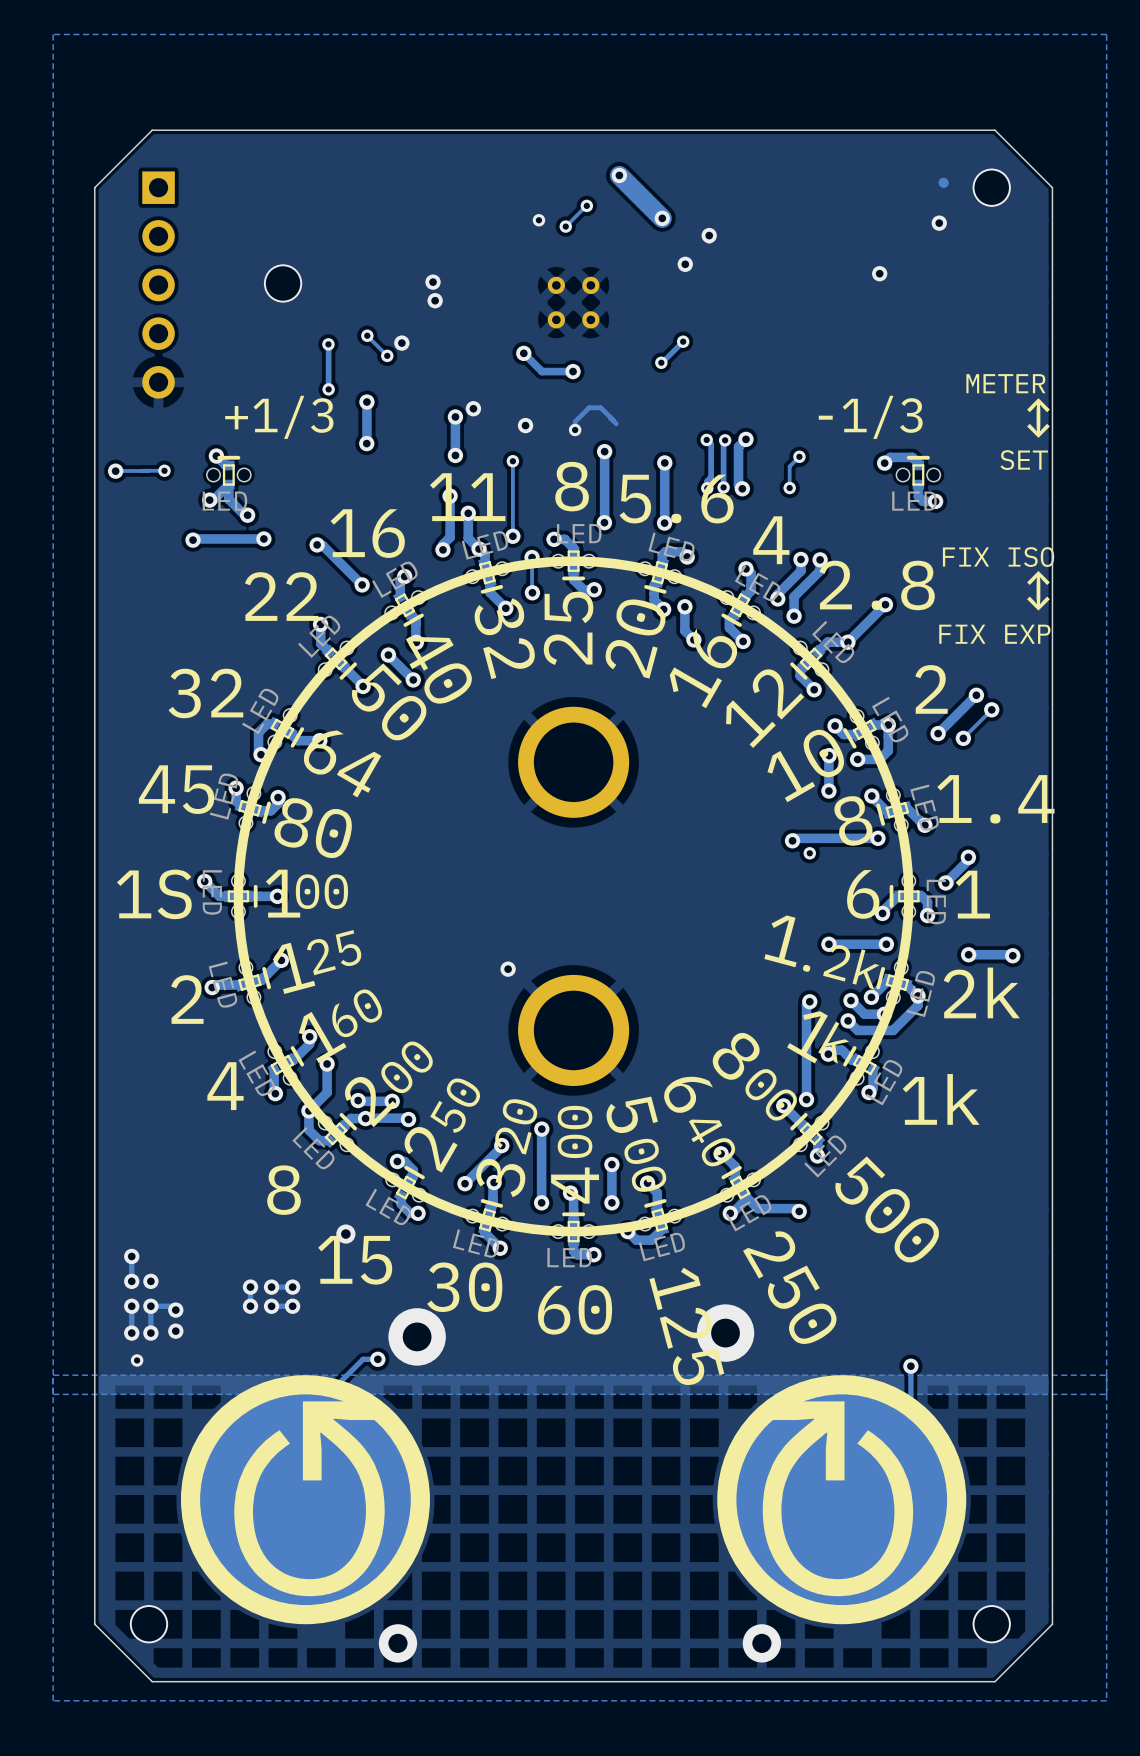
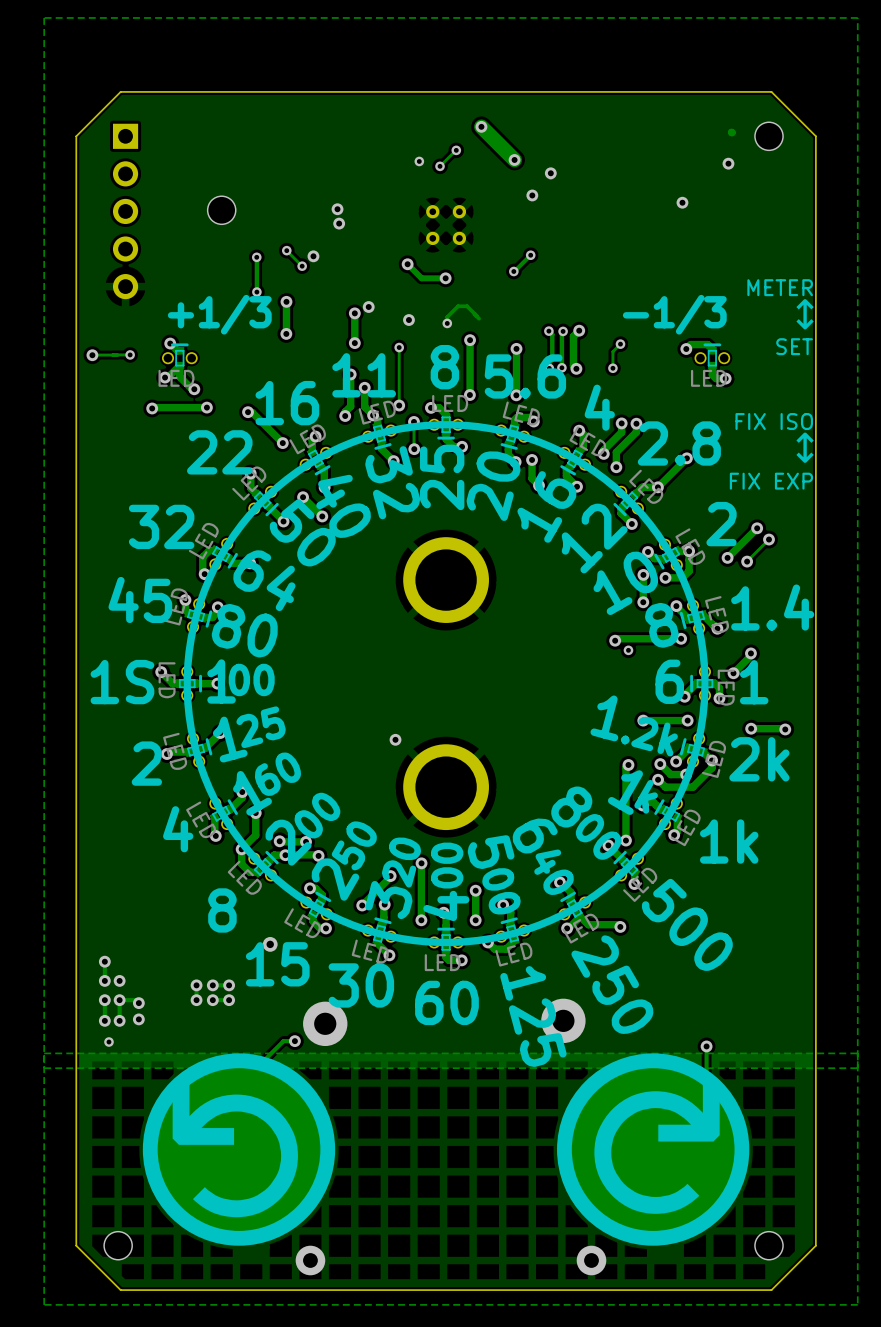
text rotation: 0° (309, 1498) -> 90° counterclockwise (235, 1150)
text rotation: 0° (837, 1498) -> 90° clockwise (657, 1146)

